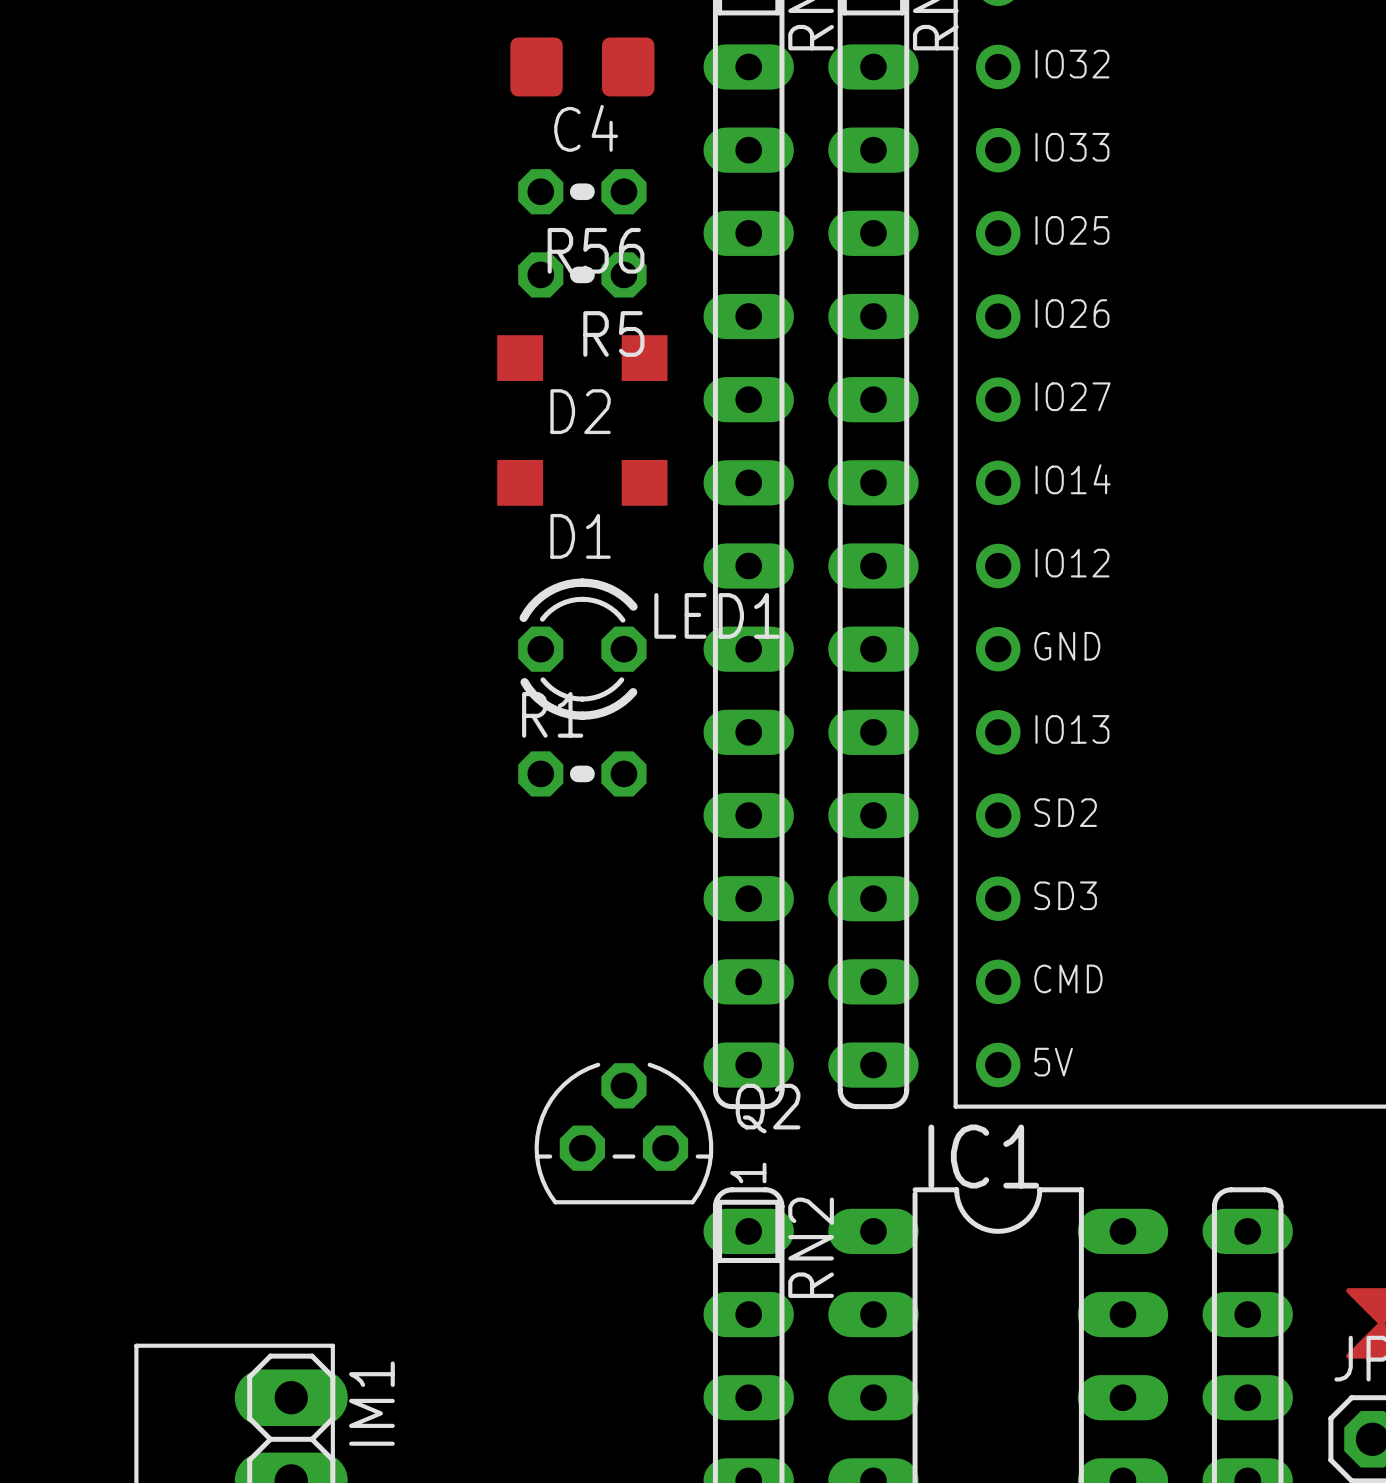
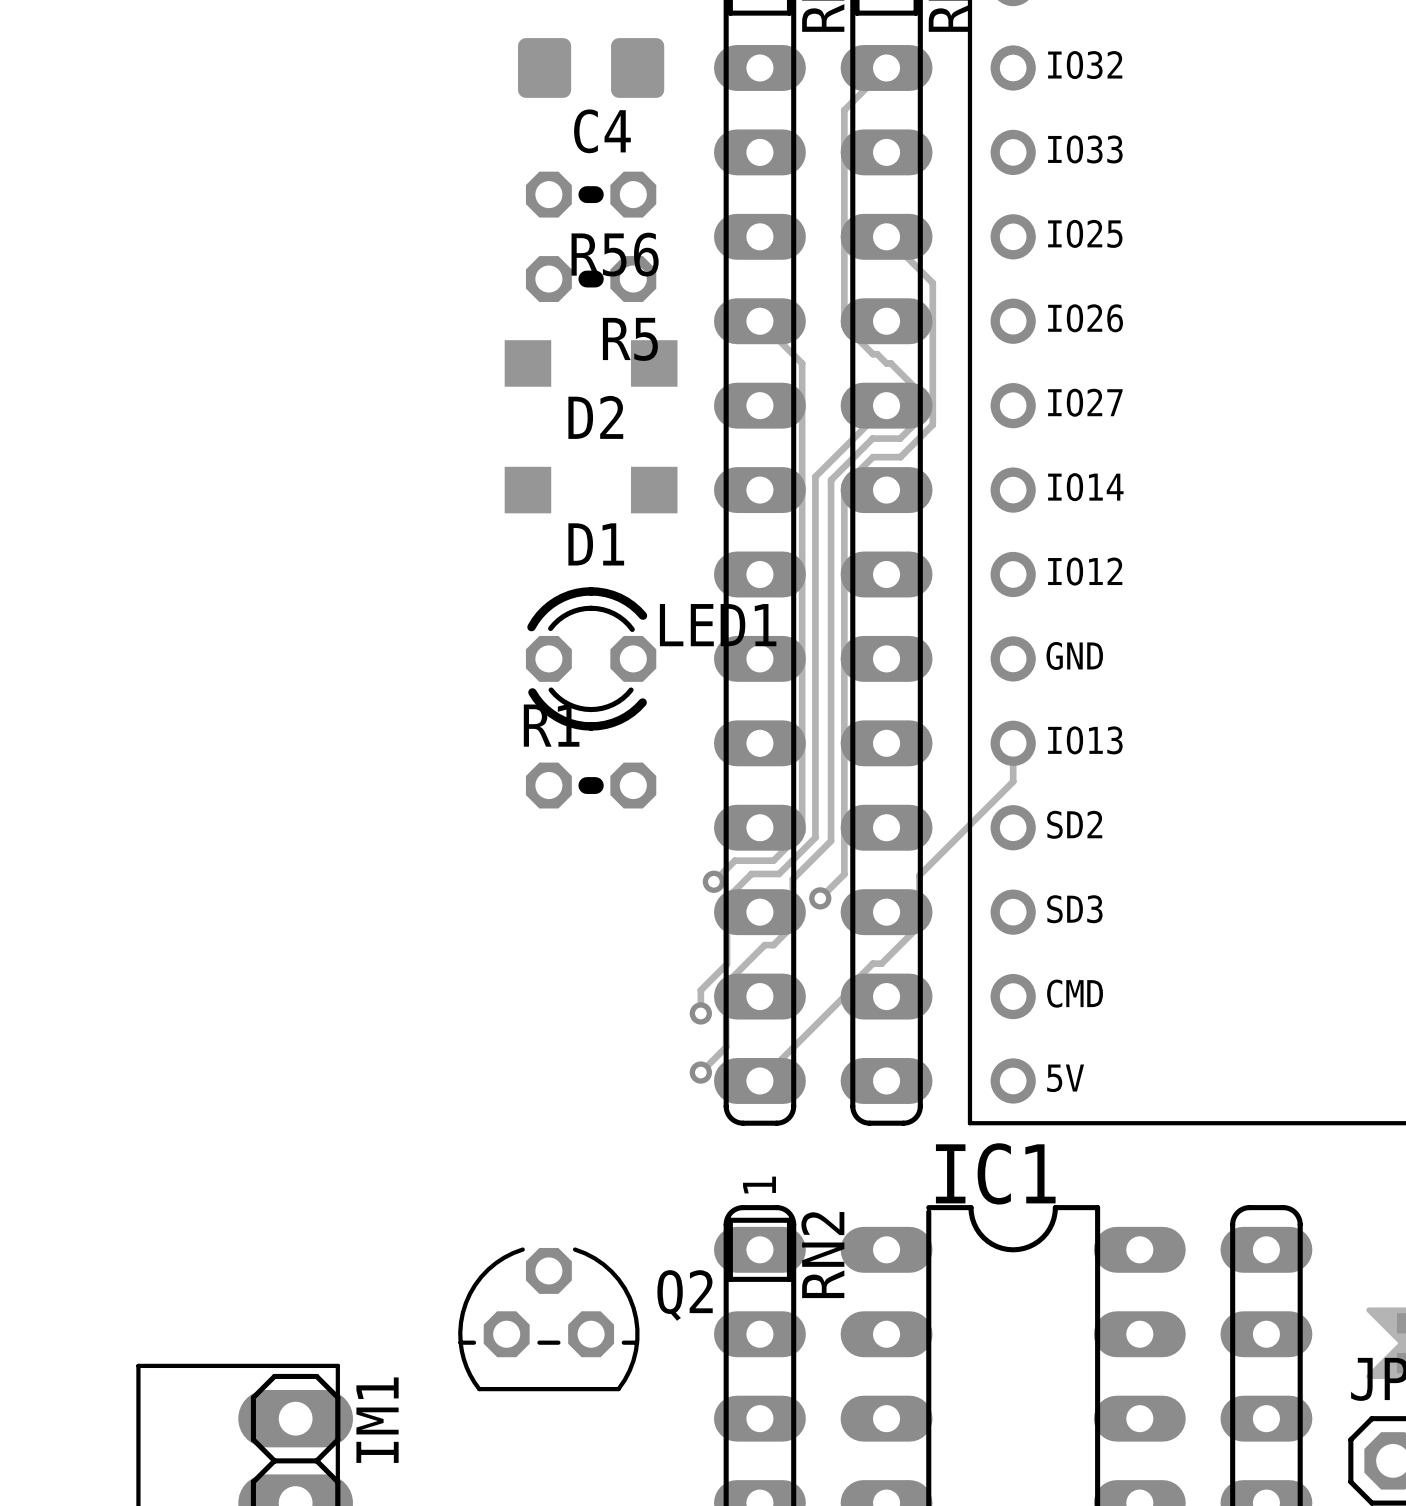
track: none -> (886, 67) (844, 110) (844, 325) (872, 354) (877, 354) (886, 363) (890, 363) (919, 392) (919, 419) (900, 438) (872, 438) (831, 480) (831, 841) (792, 879) (792, 925) (773, 945) (764, 945) (727, 982) (726, 1047) (700, 1072)
track: none -> (886, 236) (932, 283) (932, 424) (900, 457) (872, 457) (844, 485) (844, 874) (820, 898)
track: none -> (759, 321) (802, 363) (802, 832) (773, 860) (735, 860) (713, 881)
track: none -> (886, 405) (815, 476) (815, 837) (779, 873) (751, 873) (727, 898) (727, 964) (700, 990) (700, 1013)
track: none -> (1013, 743) (1013, 781) (919, 875) (919, 925) (881, 963) (872, 963) (853, 982) (853, 987) (759, 1080)
via: none -> (713, 881)
via: none -> (820, 898)
via: none -> (700, 1013)
via: none -> (700, 1072)
Q2 position: (623, 1133) -> (548, 1319)

